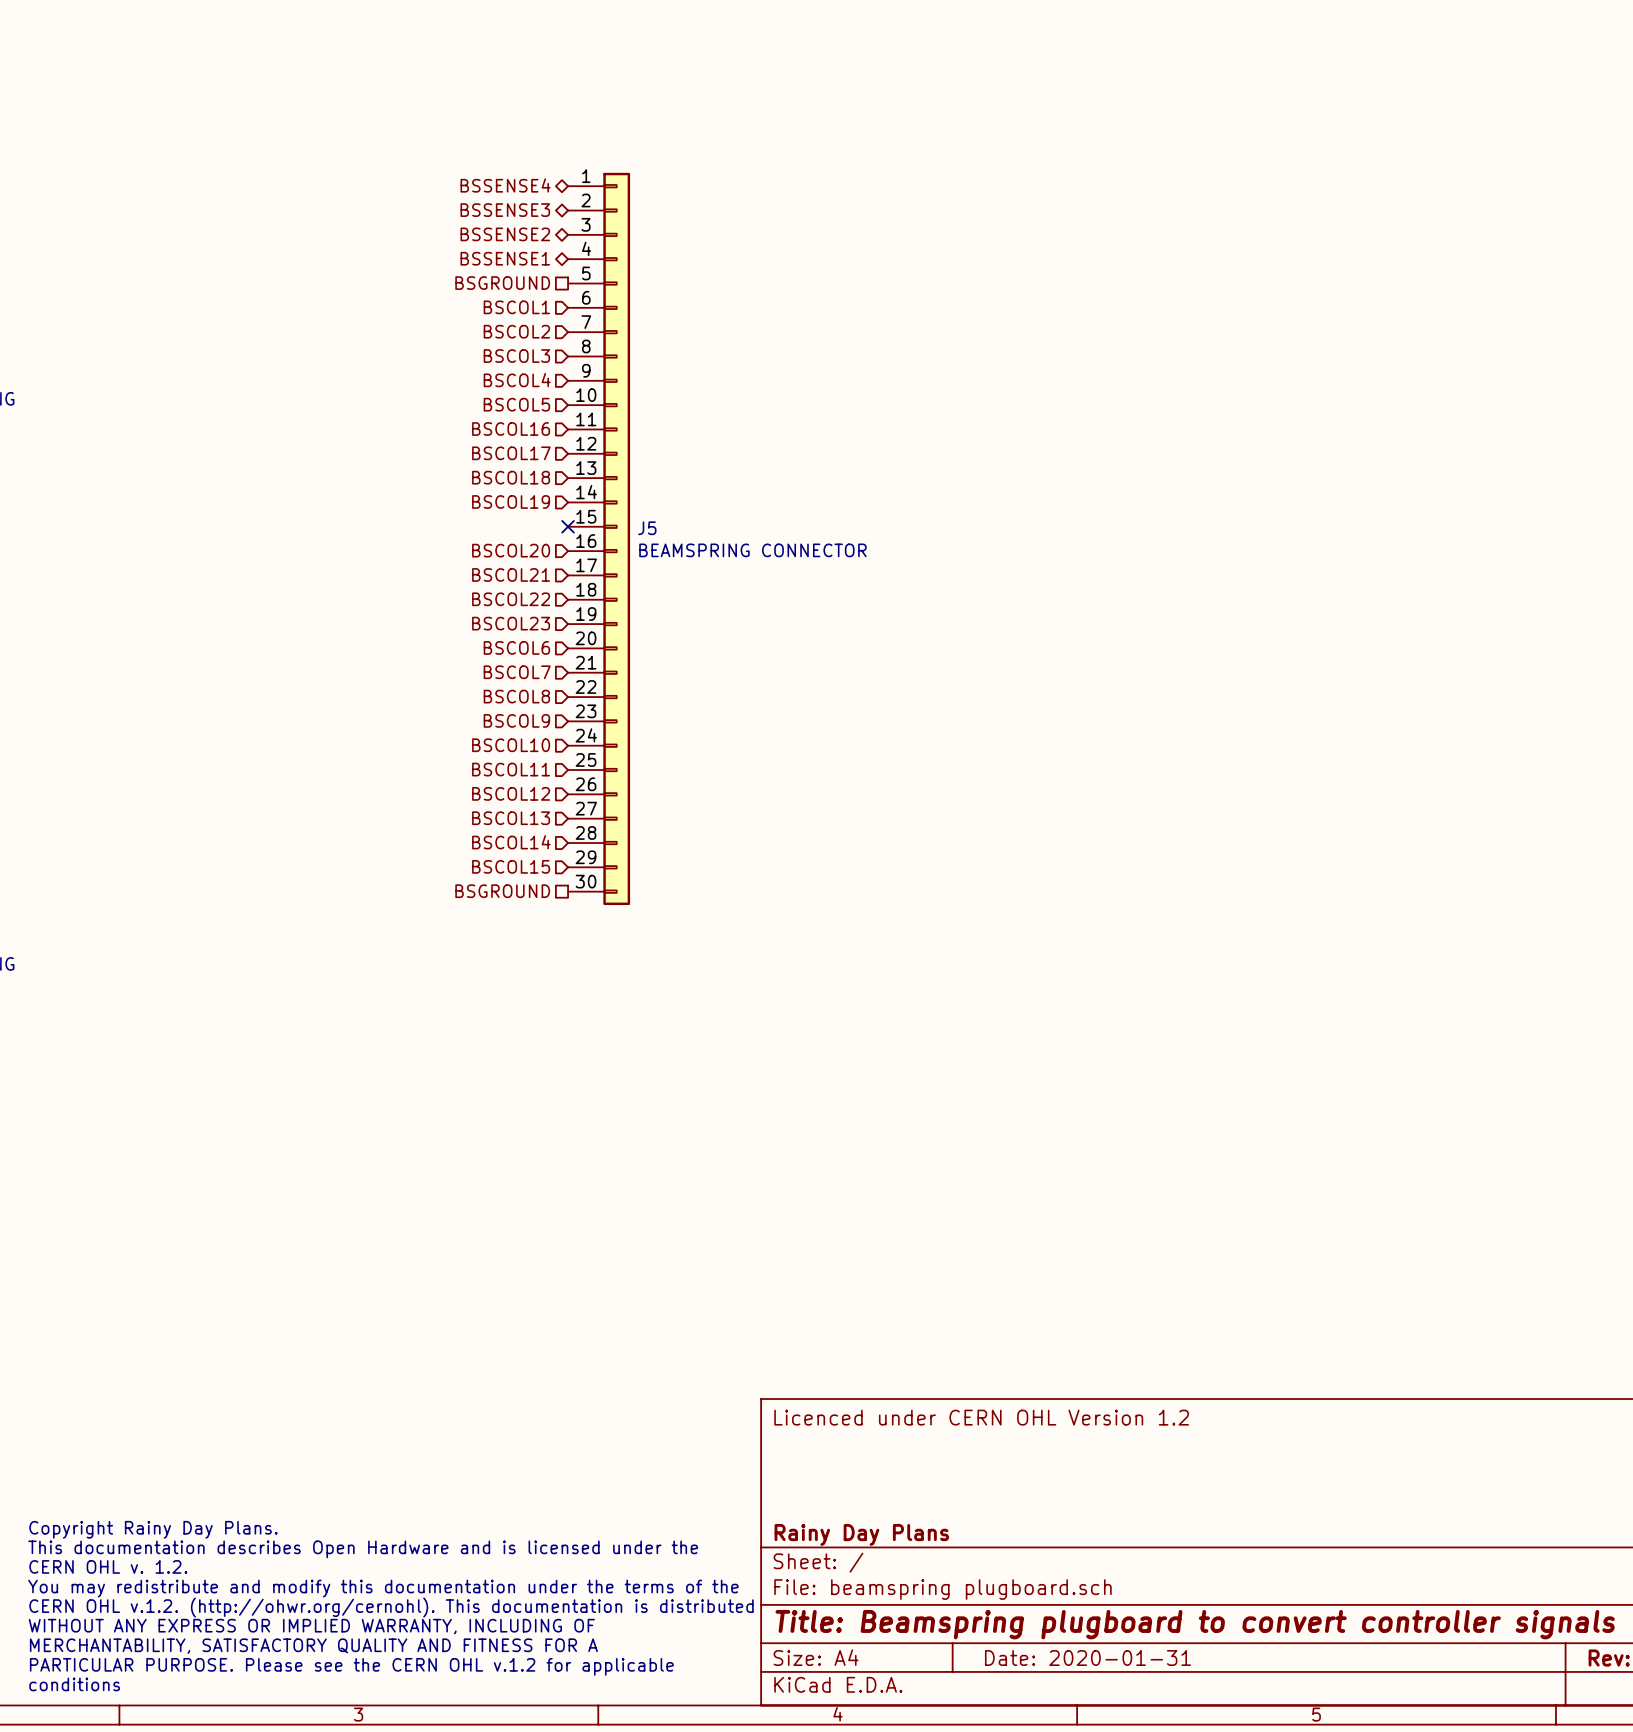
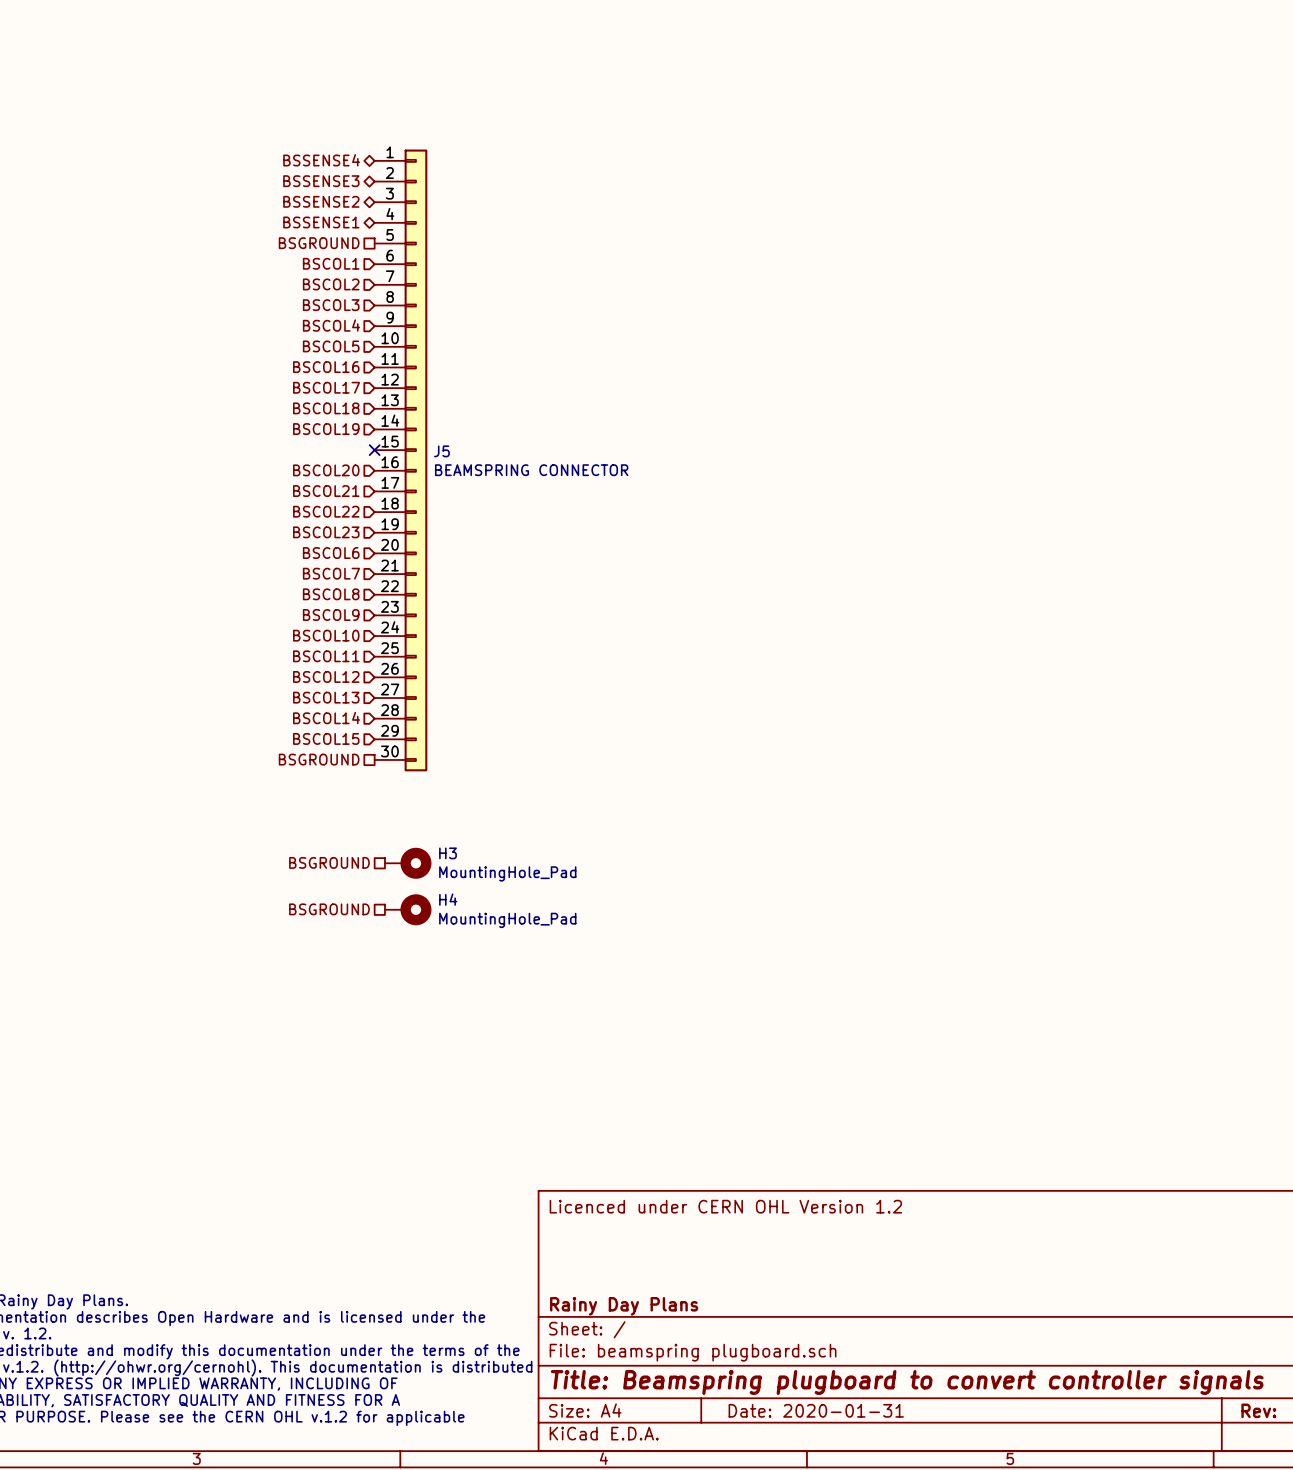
hierarchical label: none -> BSGROUND (329, 862)
H3: none -> MountingHole_Pad (408, 863)
hierarchical label: none -> BSGROUND (329, 909)
H4: none -> MountingHole_Pad (408, 909)

